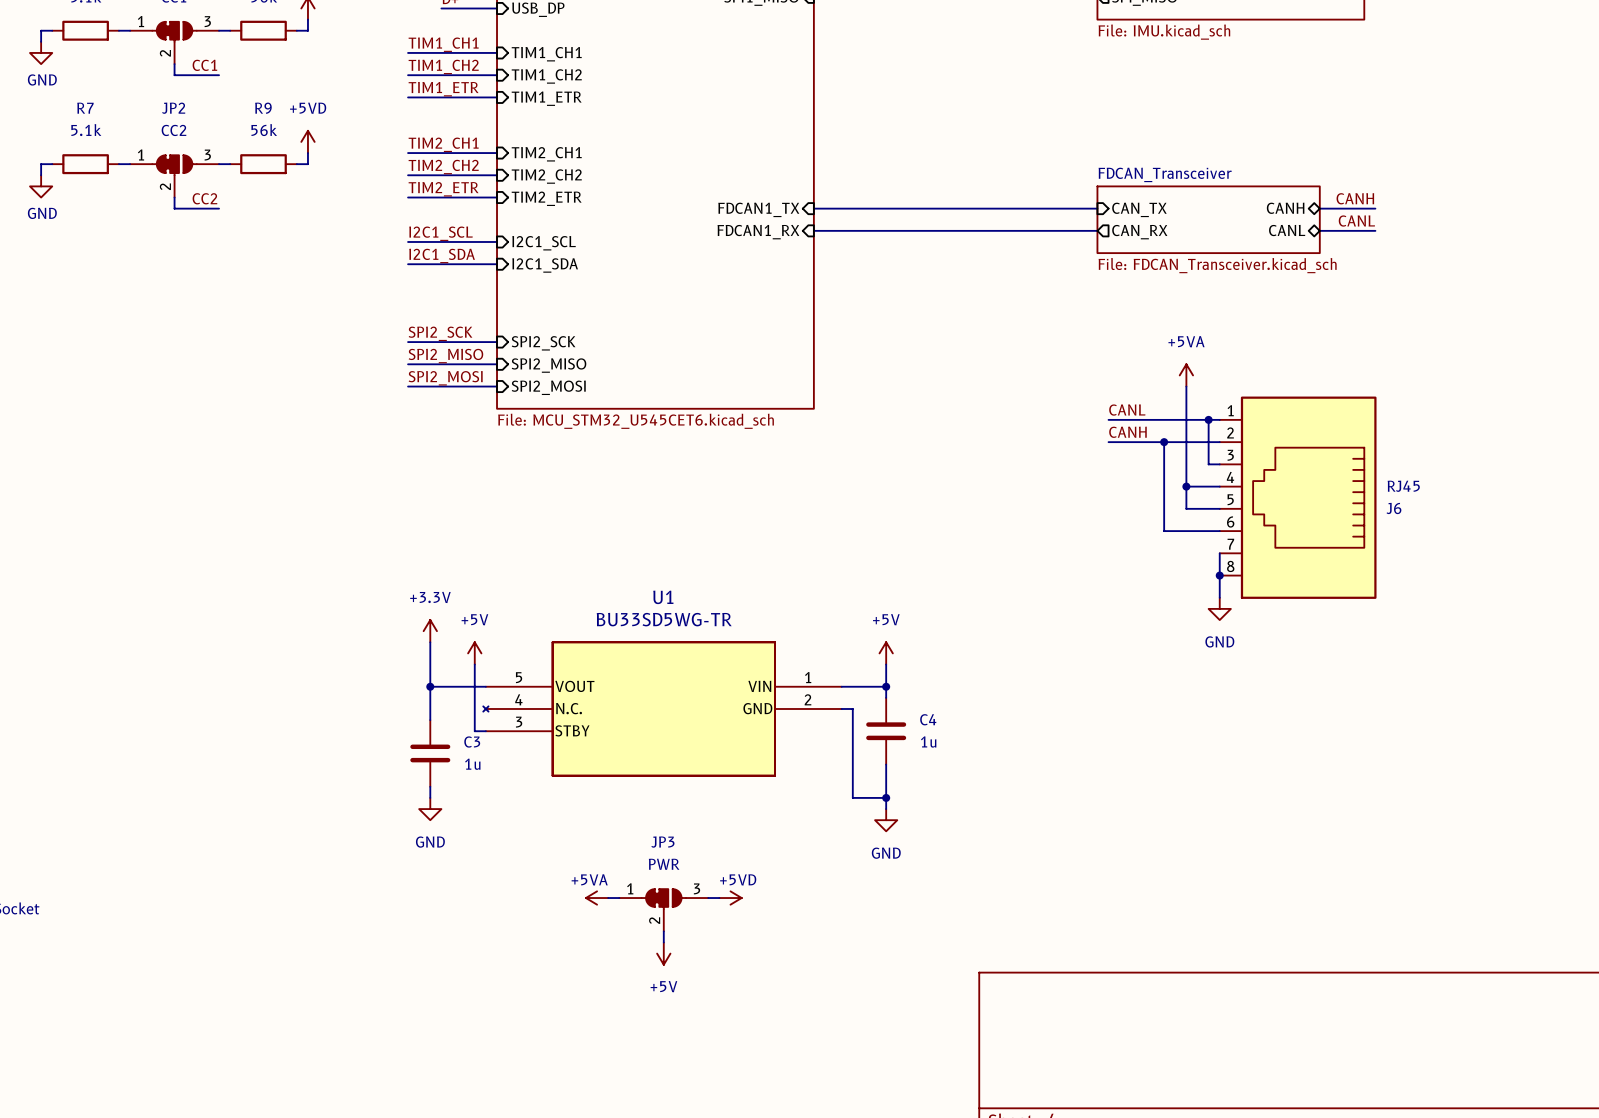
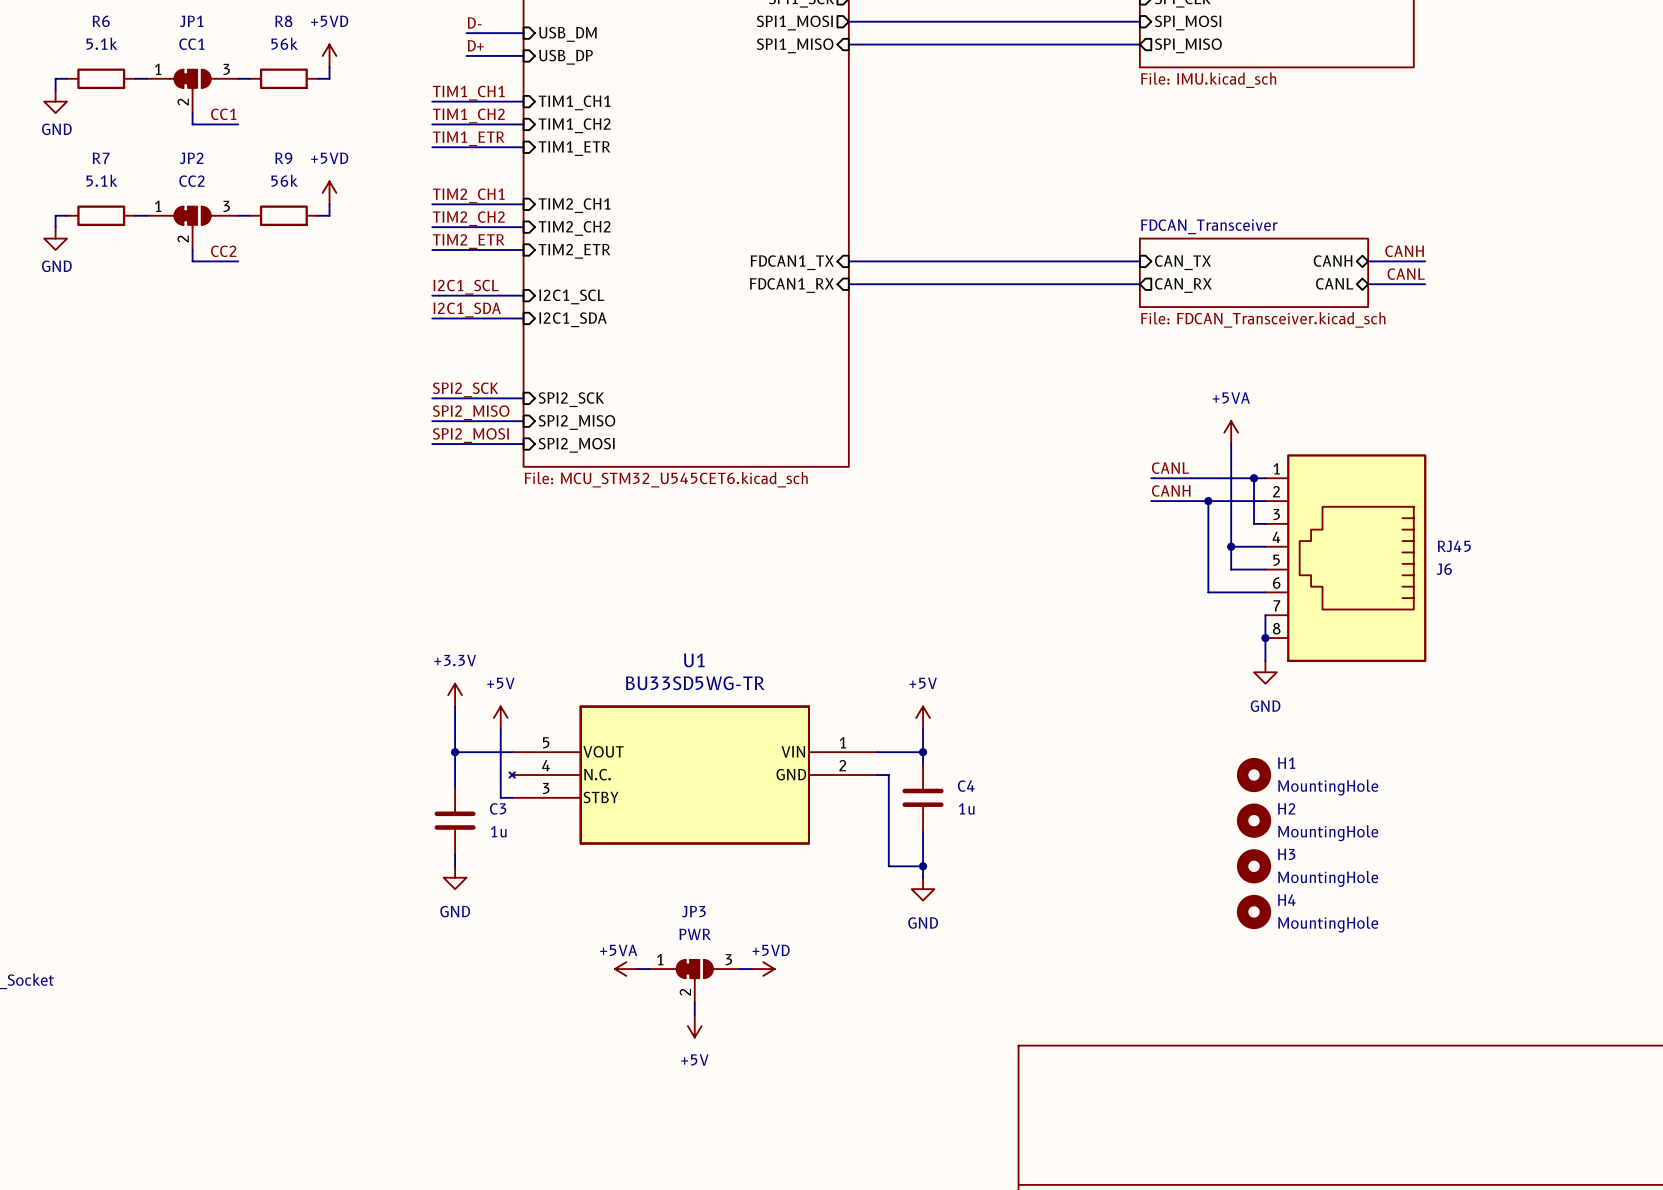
H1: none -> MountingHole (1254, 775)
H2: none -> MountingHole (1254, 820)
H3: none -> MountingHole (1254, 866)
H4: none -> MountingHole (1254, 911)

